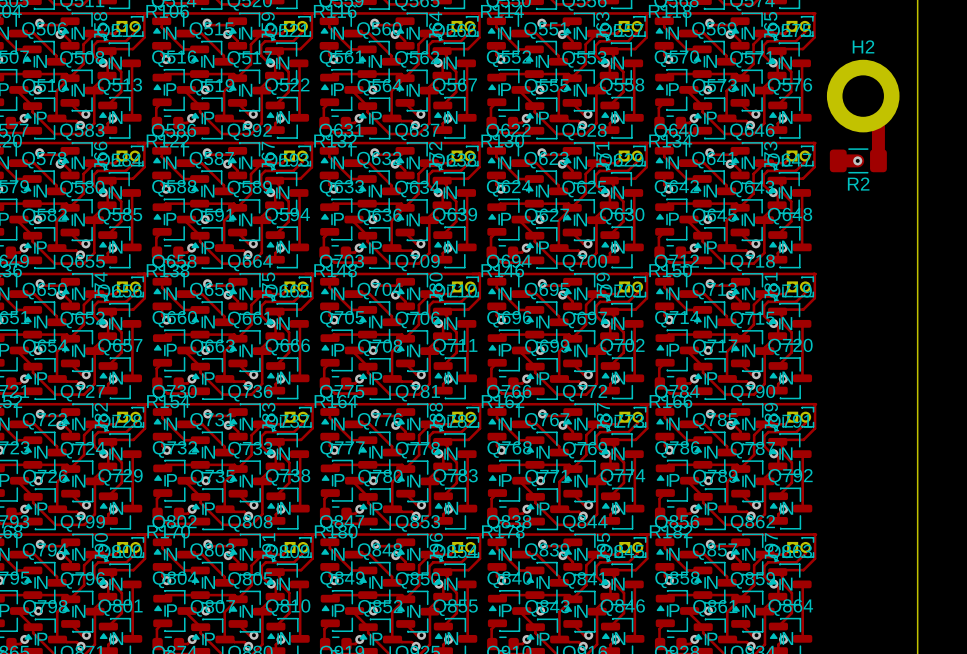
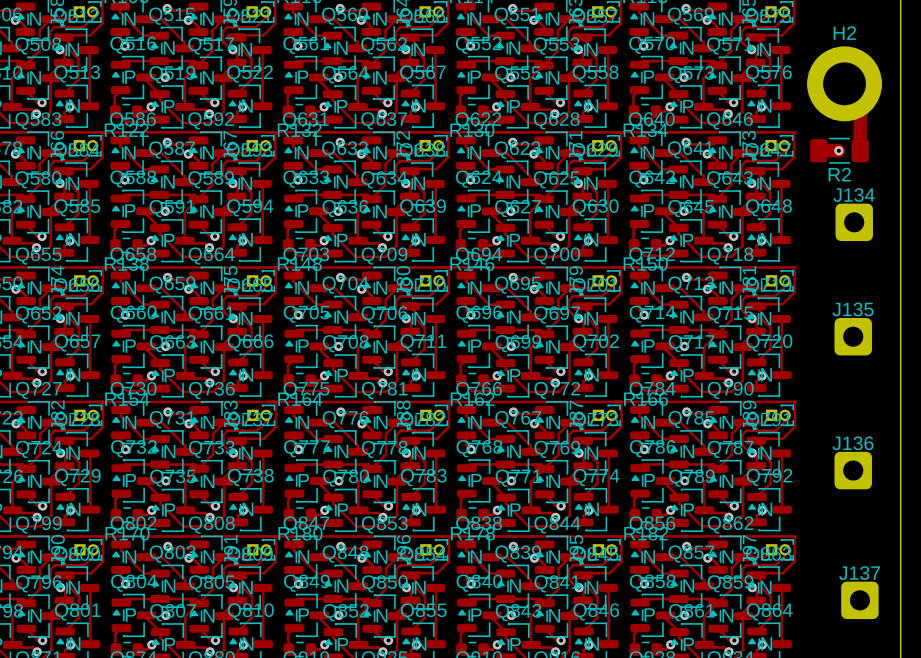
J134: none -> (854, 222)
J135: none -> (853, 336)
J136: none -> (853, 470)
J137: none -> (859, 600)

